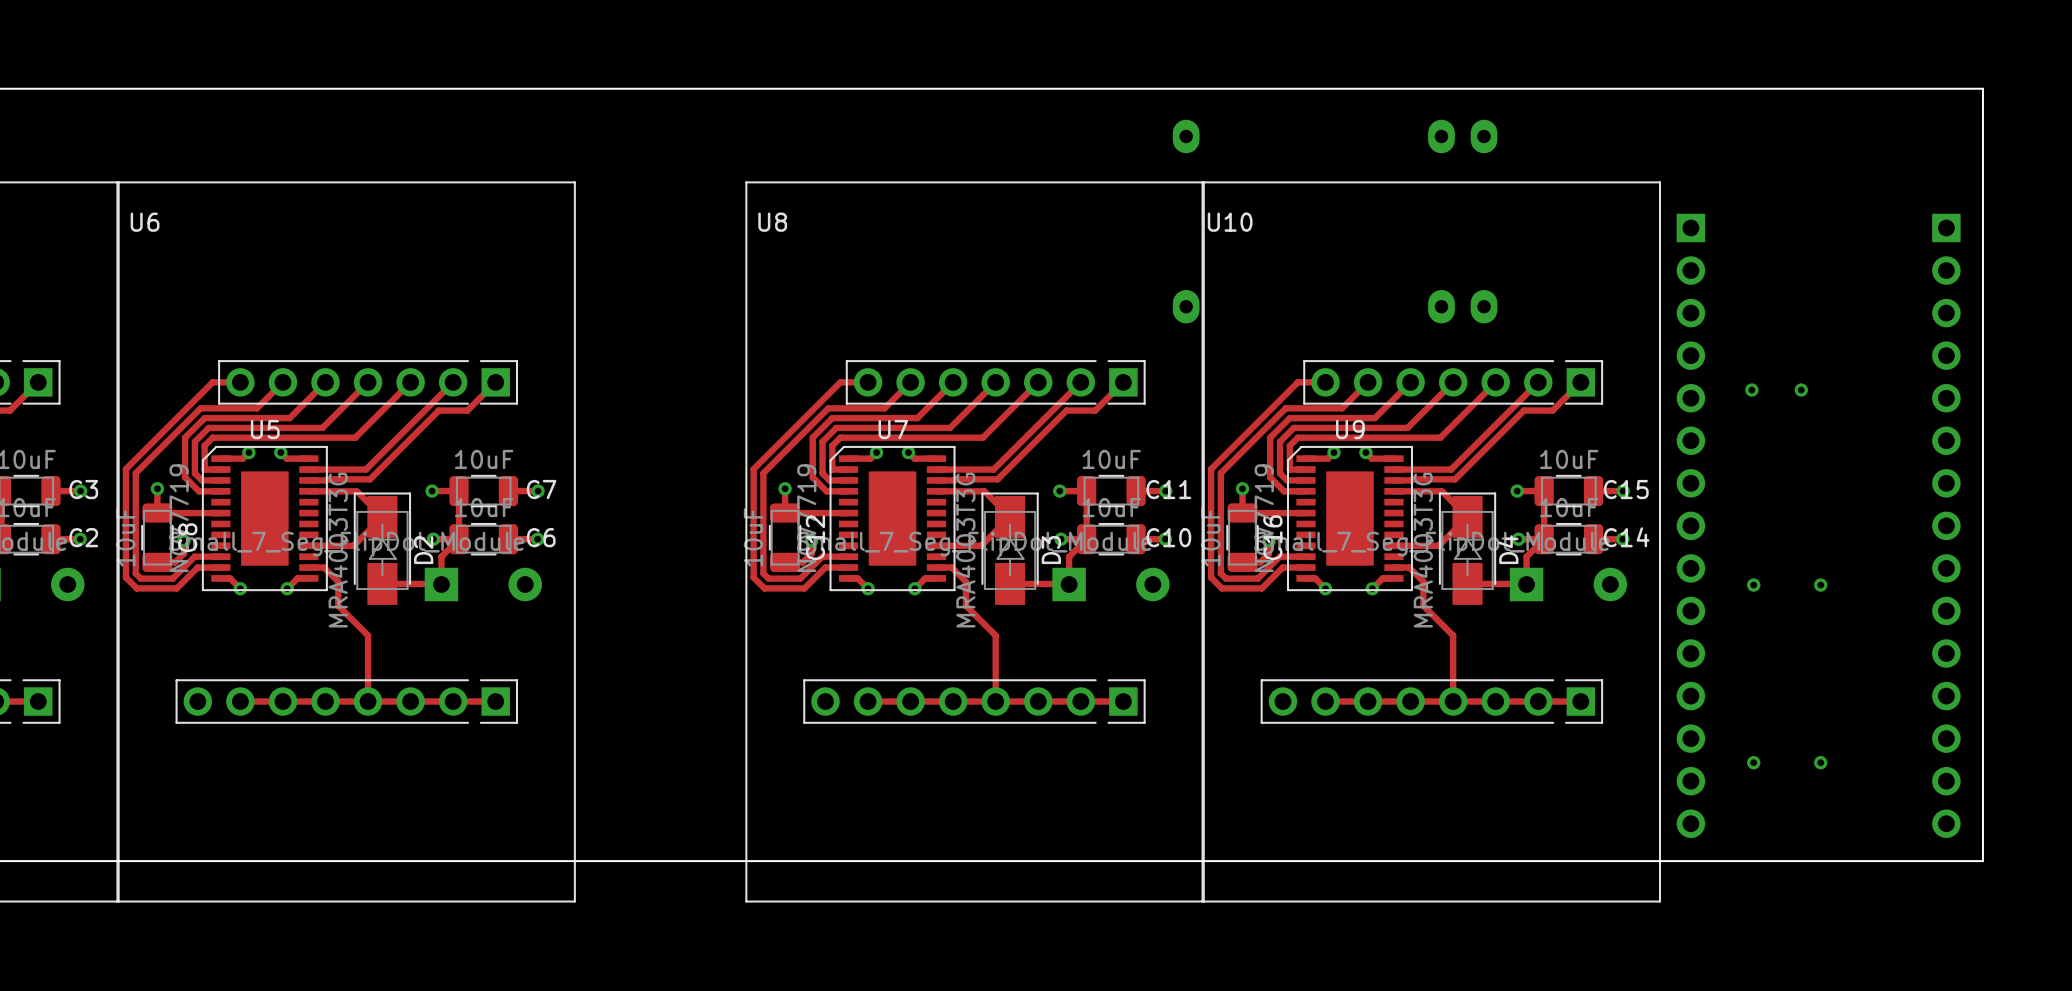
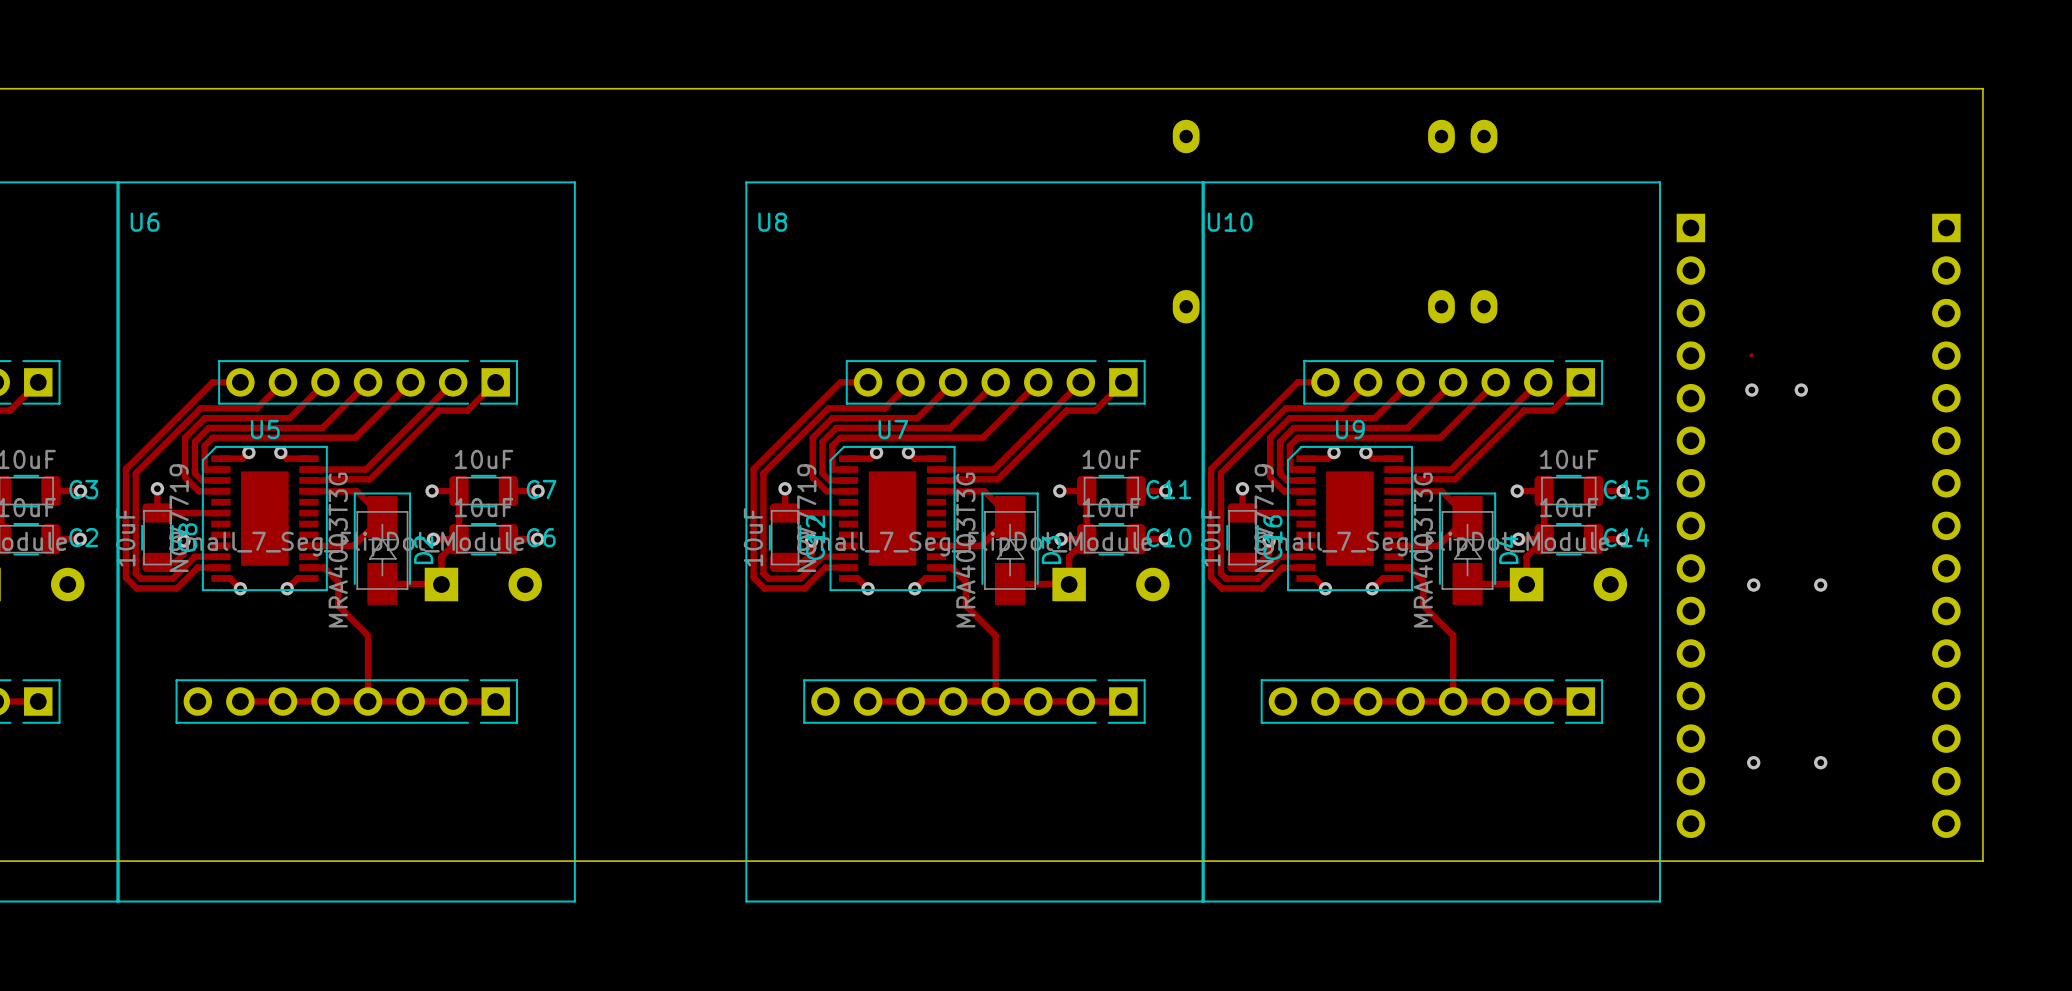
track: none -> (1751, 354) (1750, 355)

